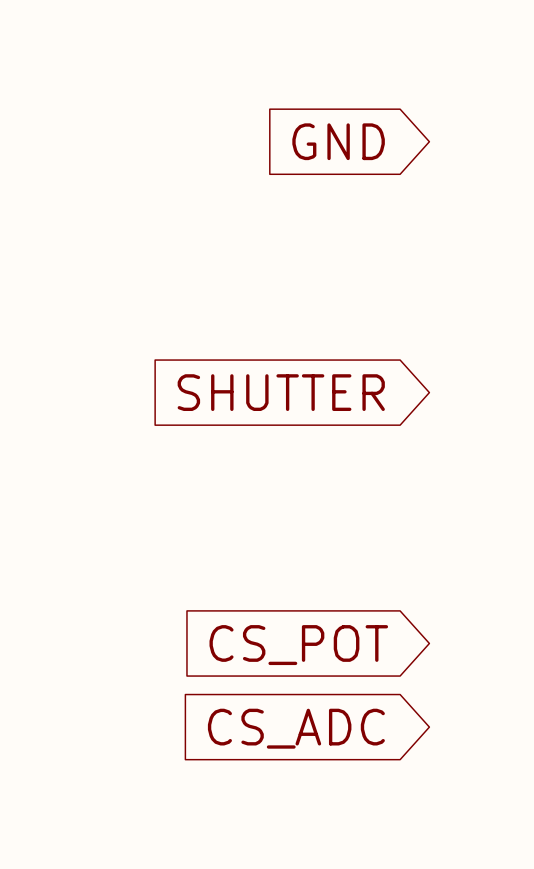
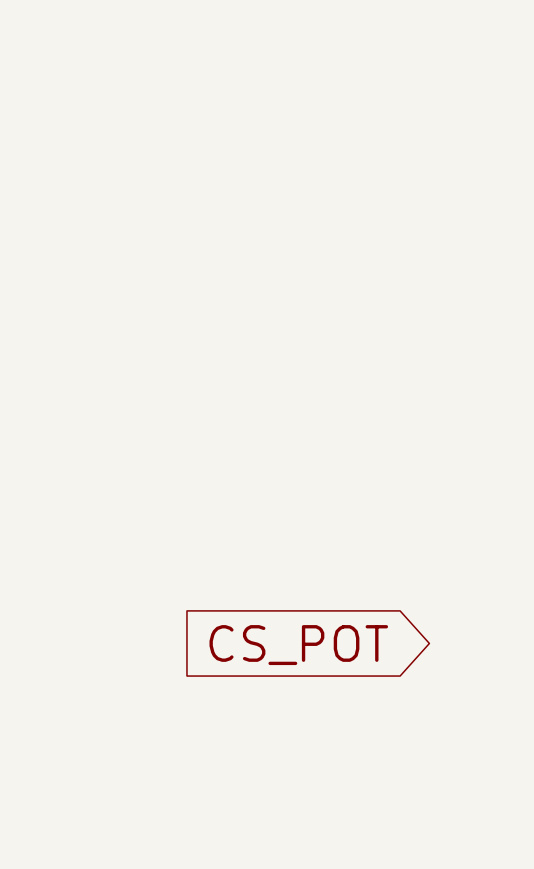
global label: GND (338, 141) -> none
global label: SHUTTER (281, 392) -> none
global label: CS_ADC (296, 728) -> none

